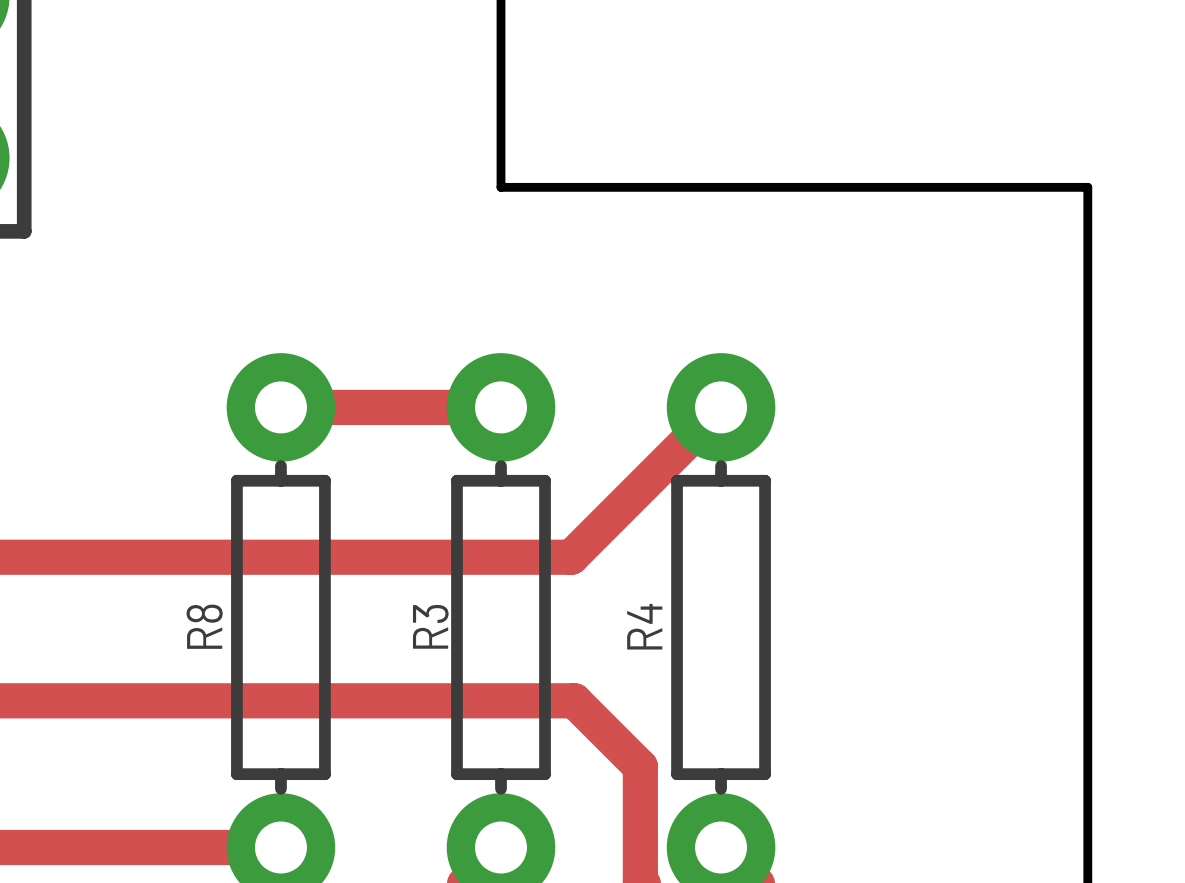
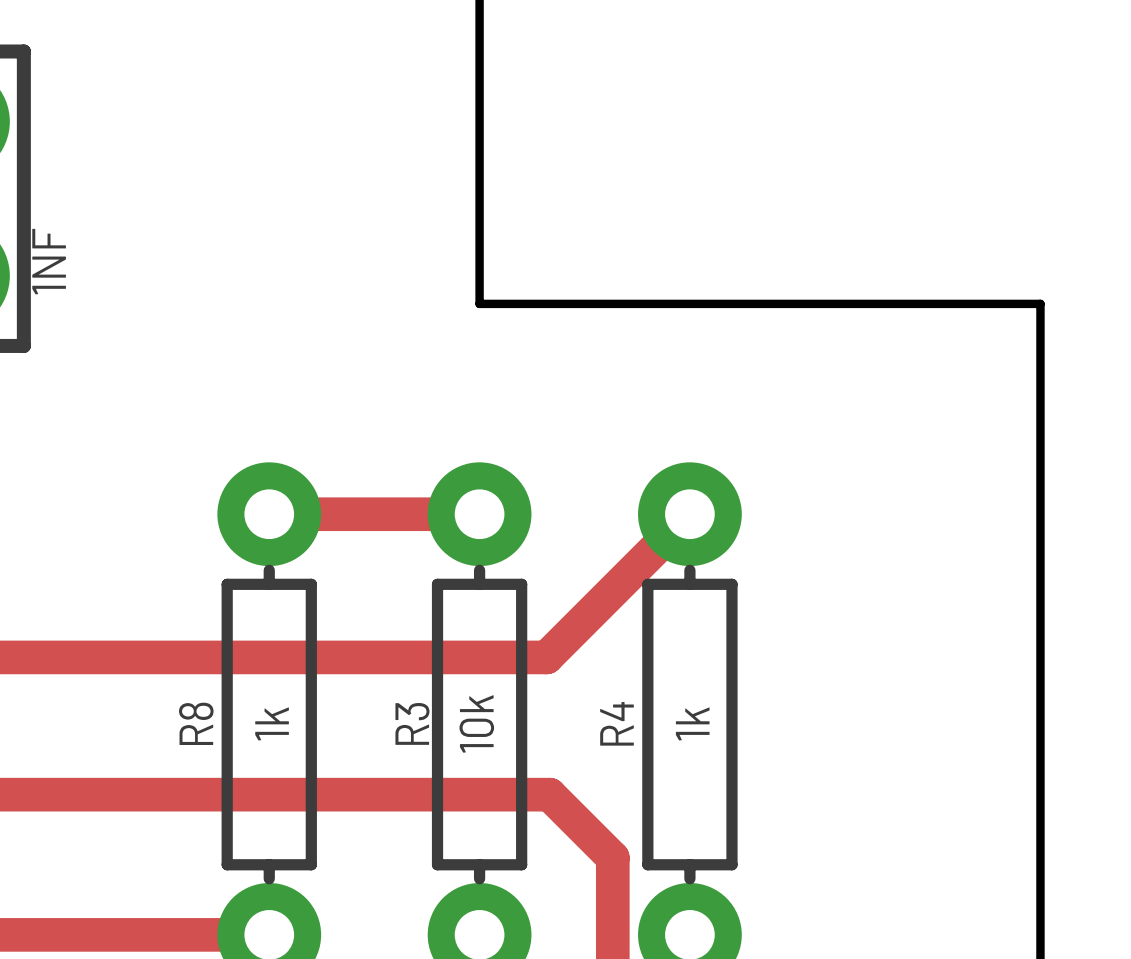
part value: none -> 1NF (49, 261)
R8 value: none -> 1k (272, 723)
R3 value: none -> 10k (476, 723)
R4 value: none -> 1k (692, 723)

